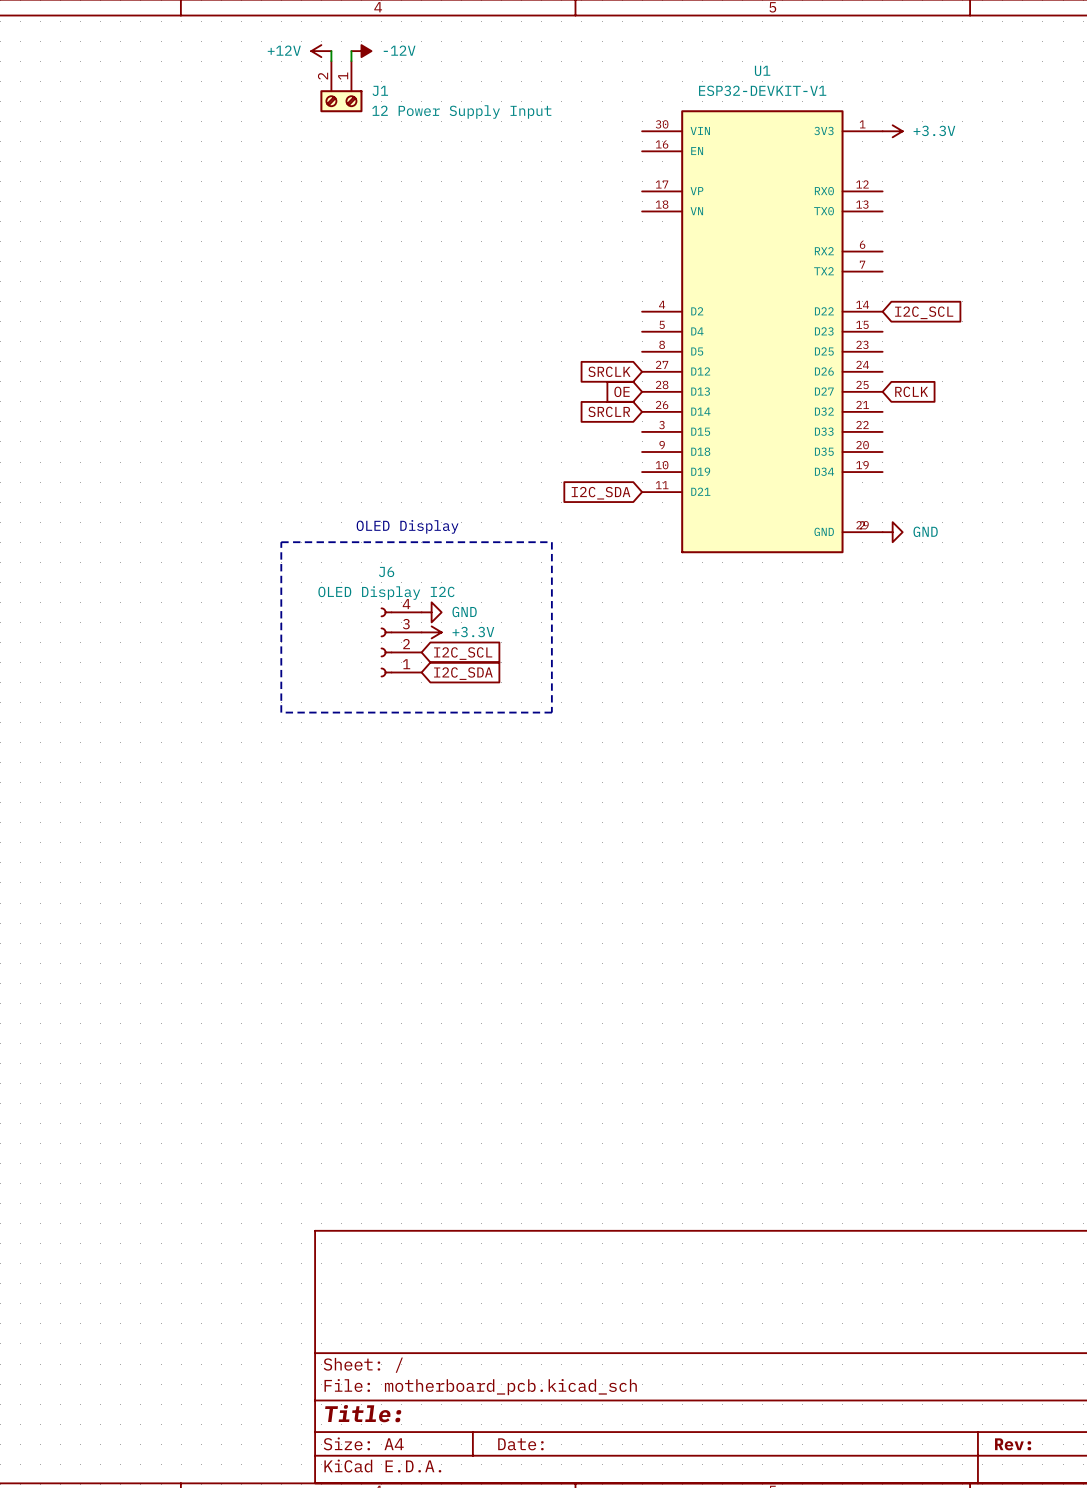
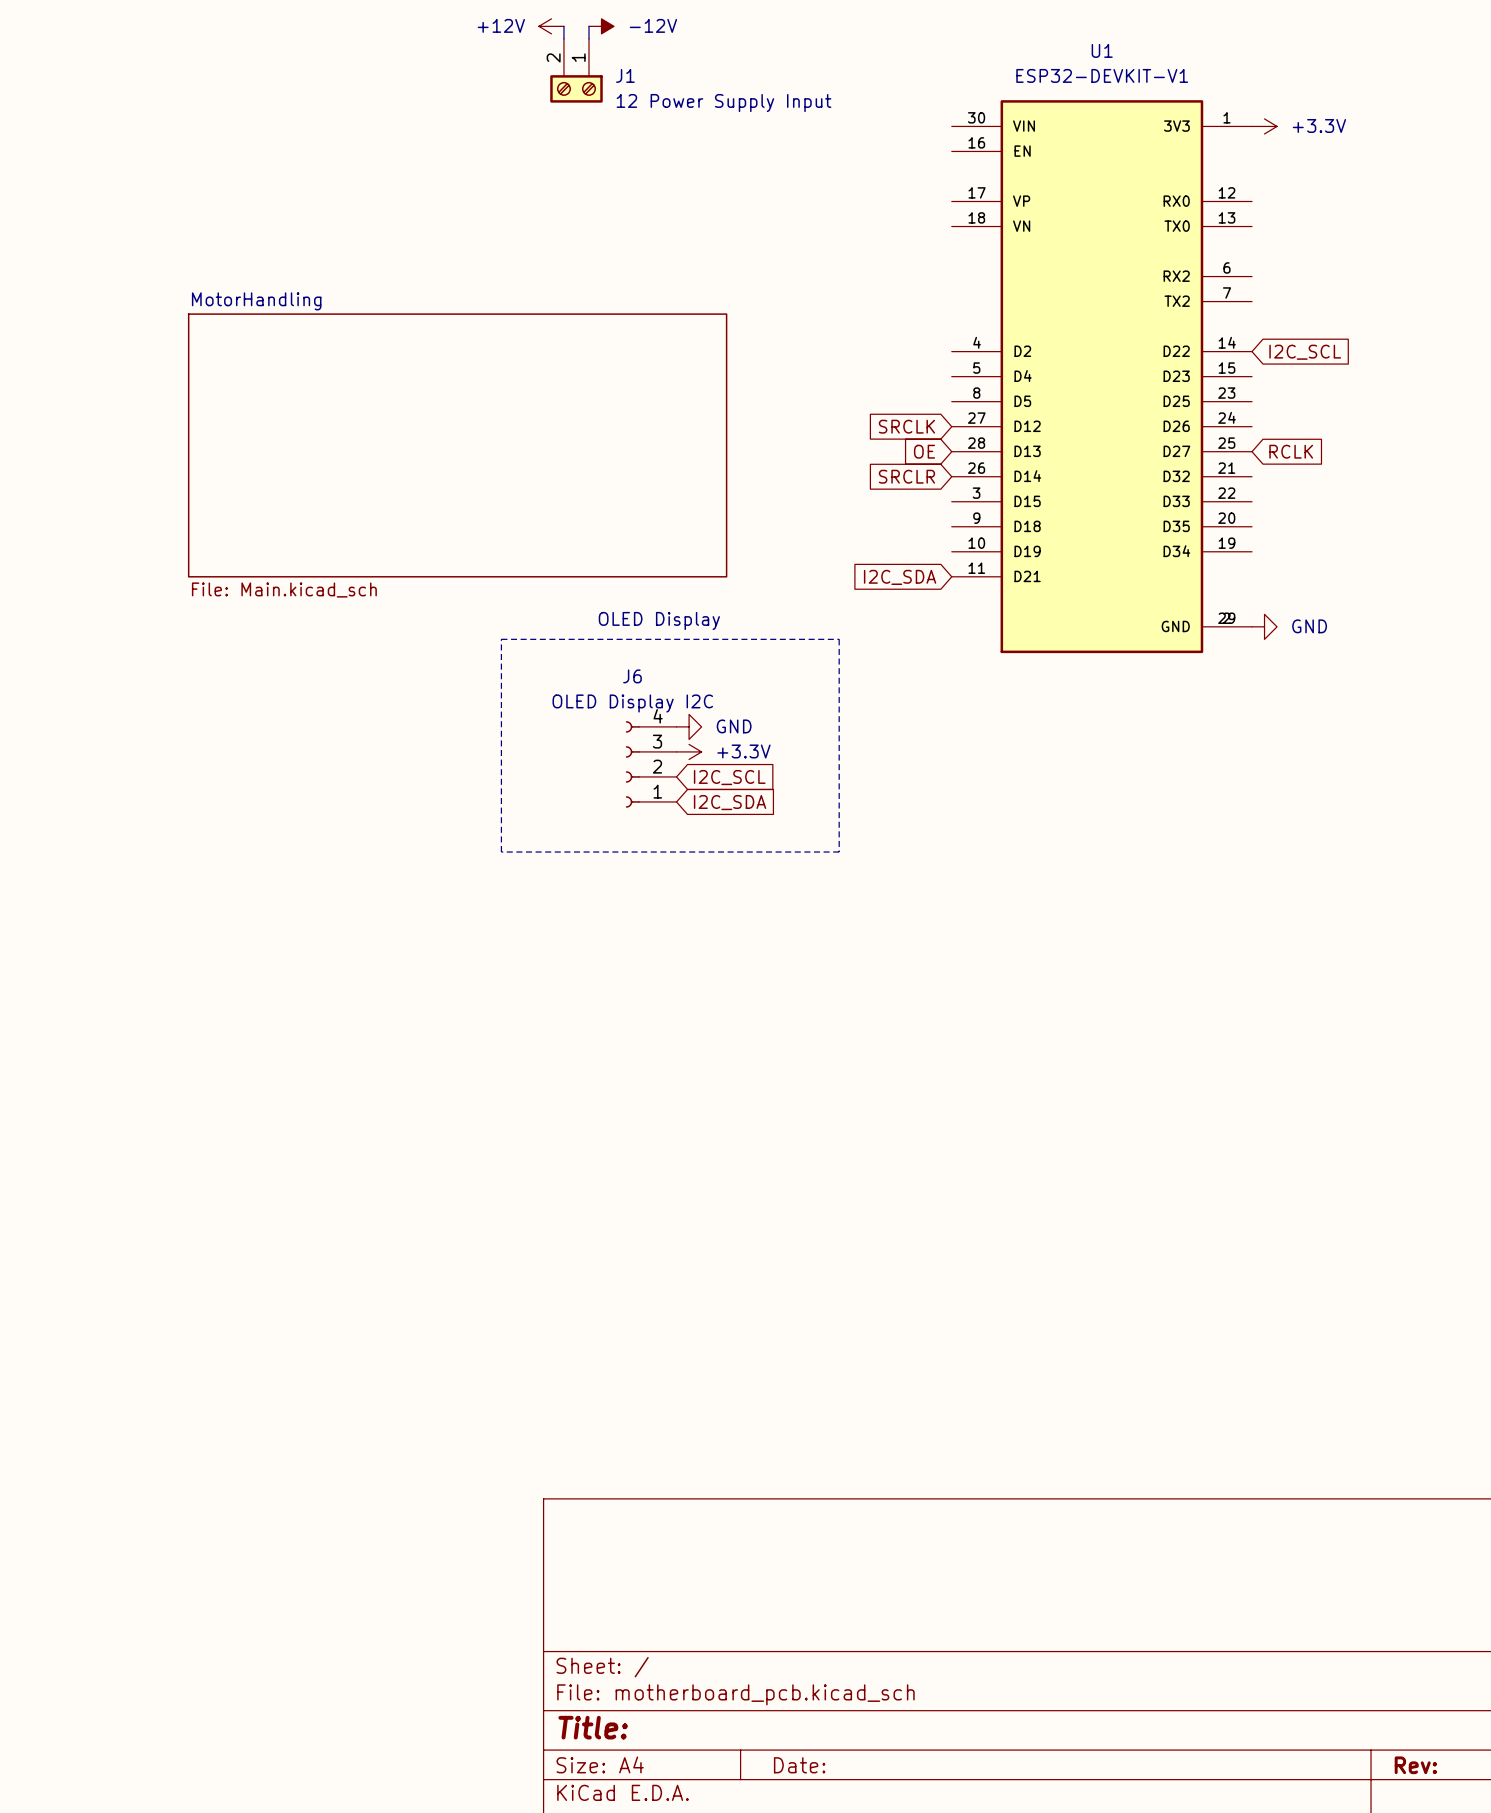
sheet MotorHandling: none -> File: Main.kicad_sch (457, 445)

